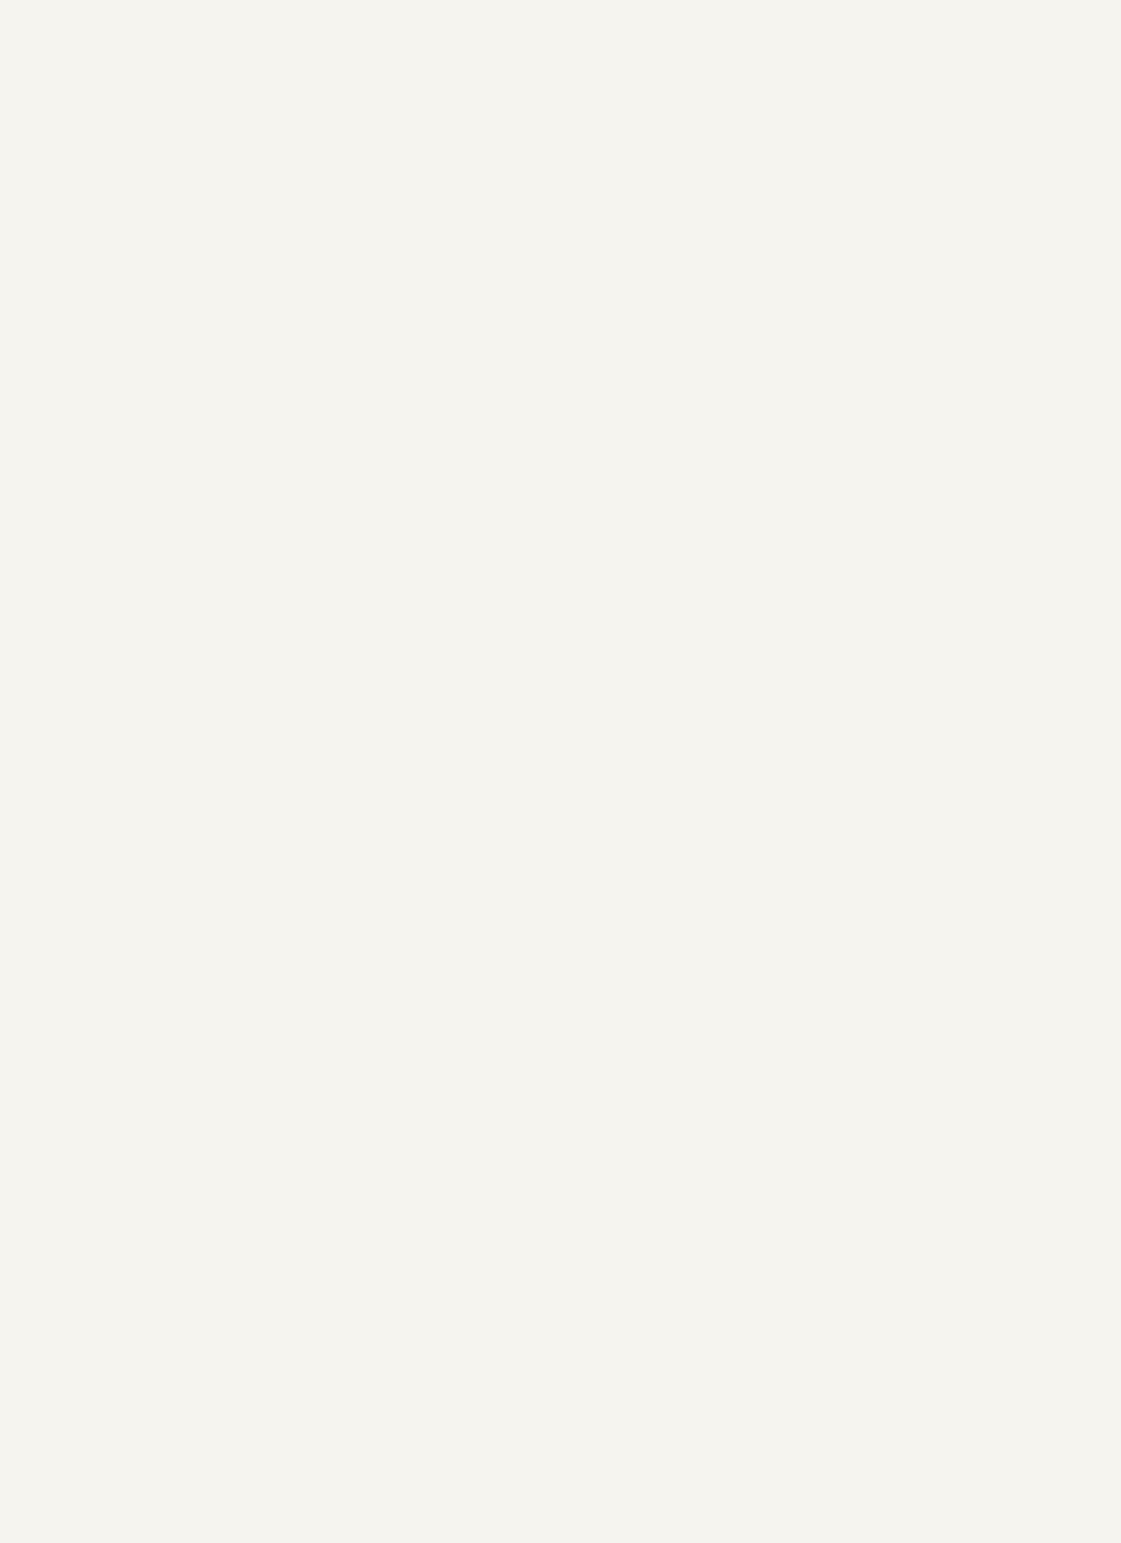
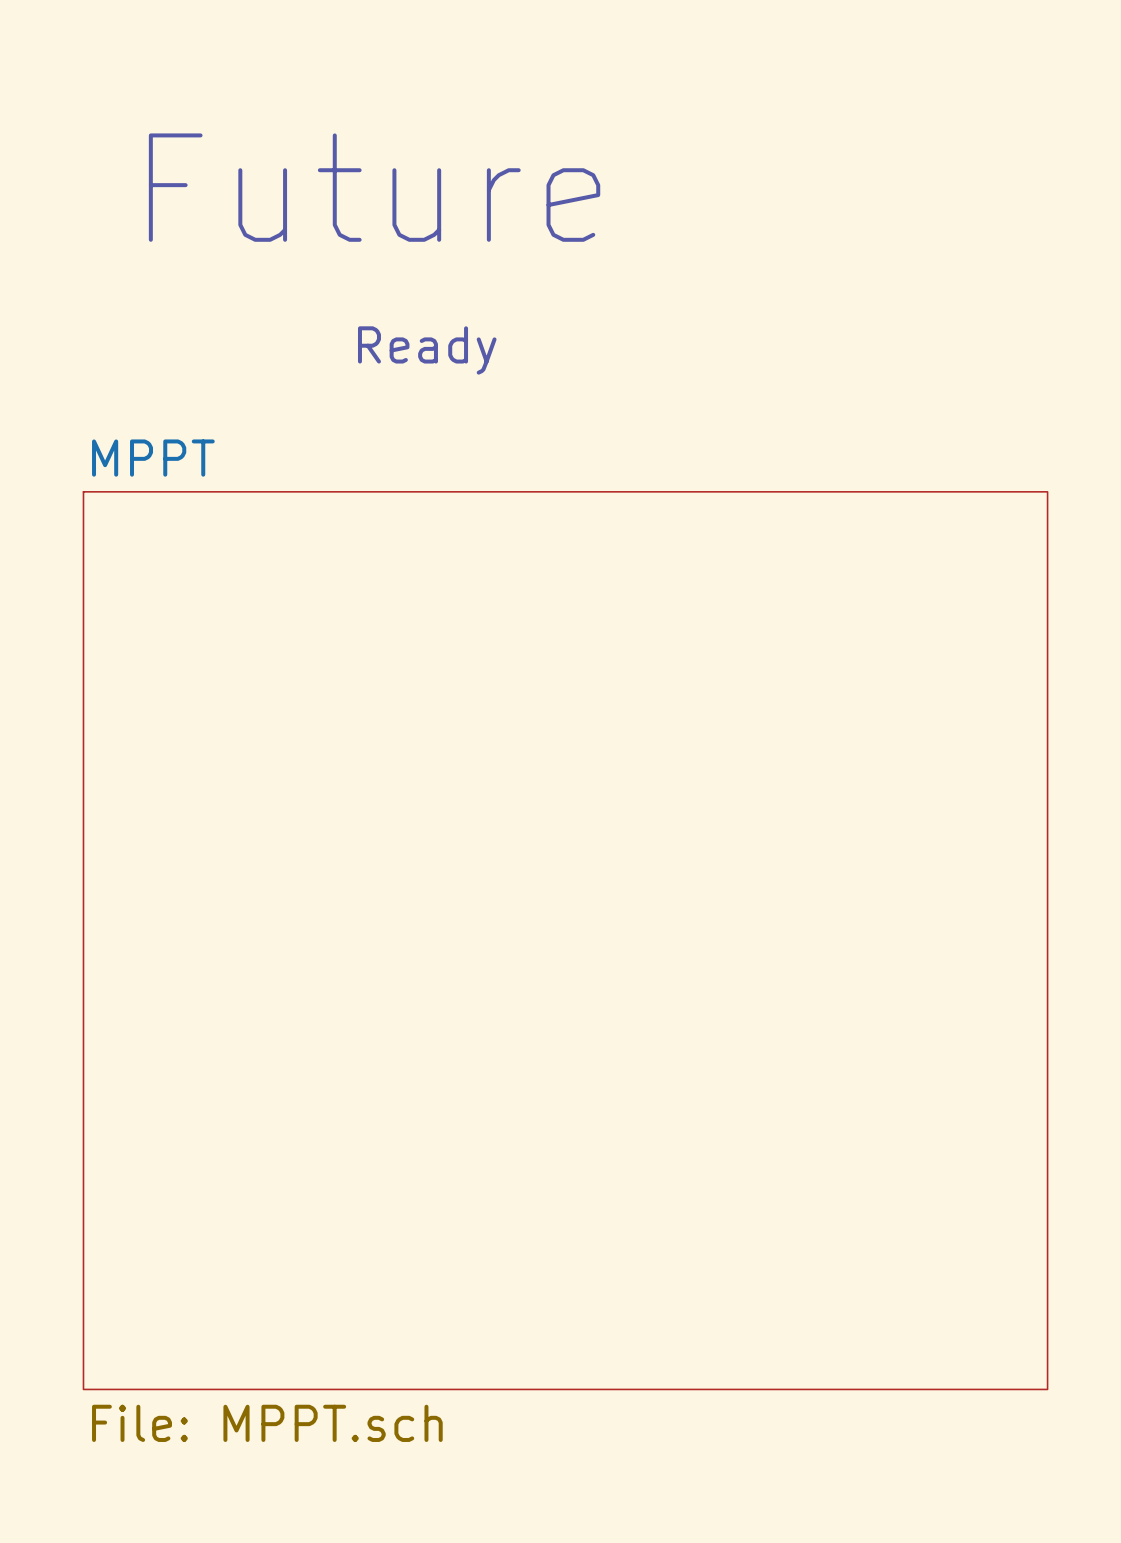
text: none -> Future (374, 187)
text: none -> Ready (427, 350)
sheet MPPT: none -> File: MPPT.sch (565, 940)

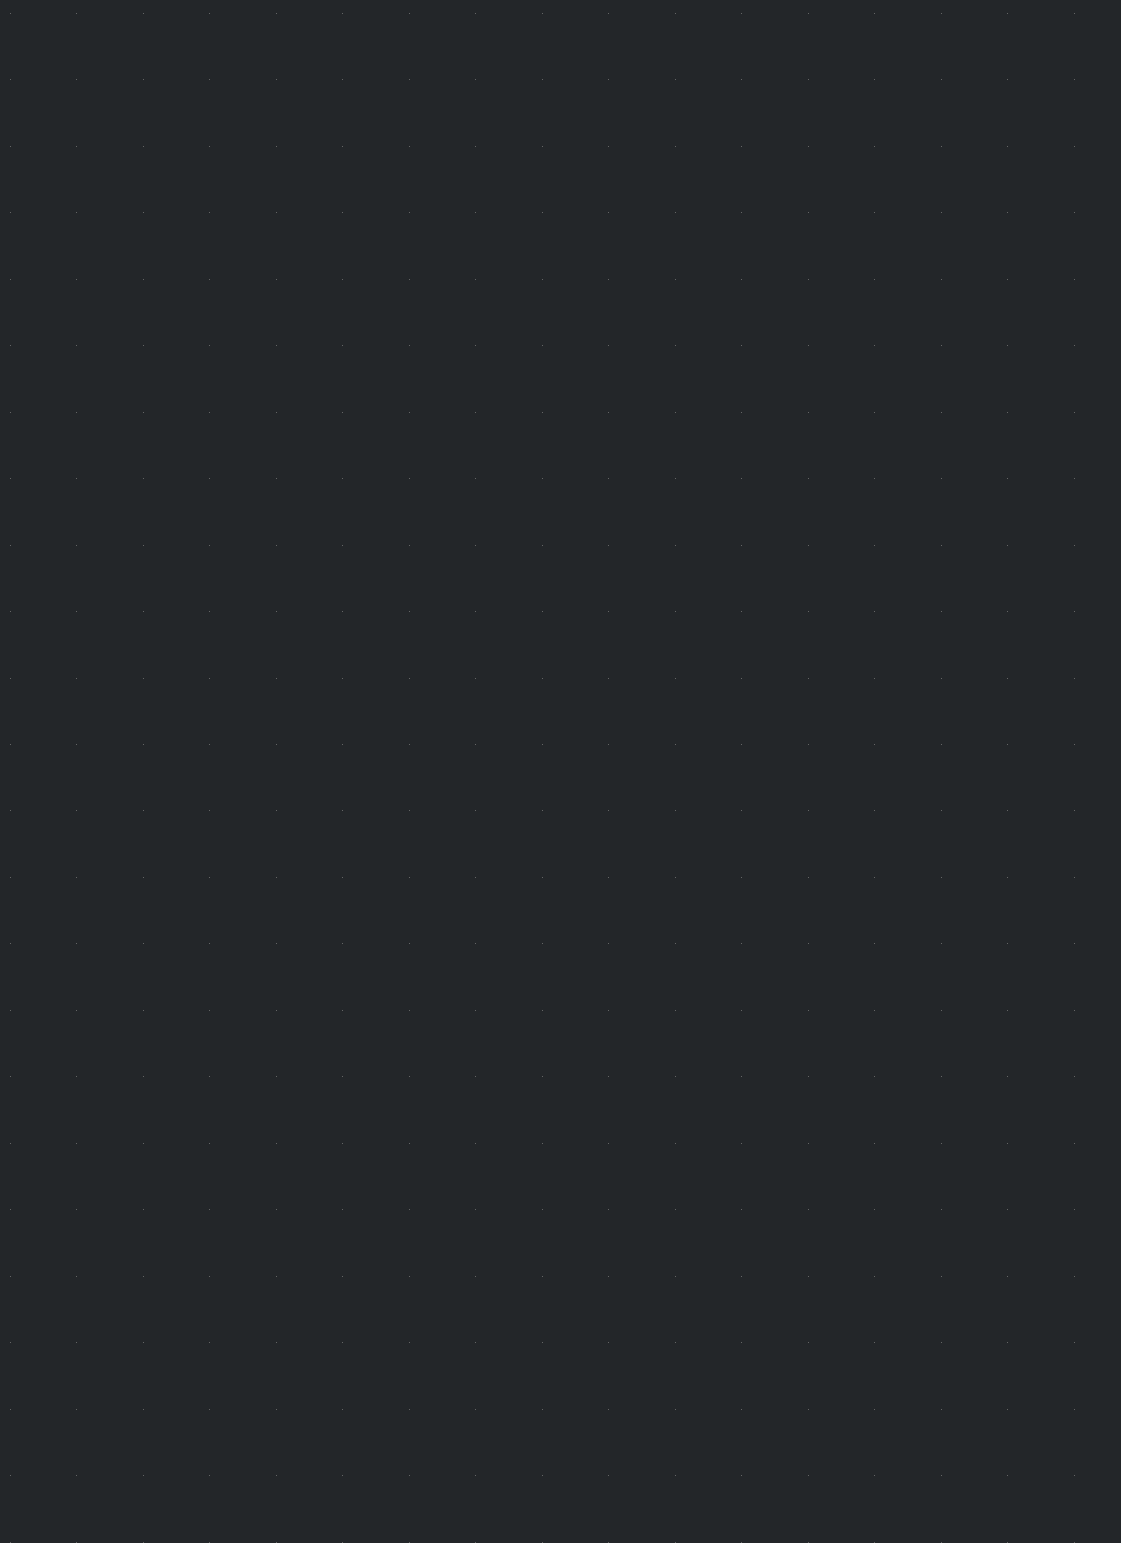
text: Future (374, 187) -> none
text: Ready (427, 350) -> none
sheet MPPT: File: MPPT.sch (565, 940) -> none

